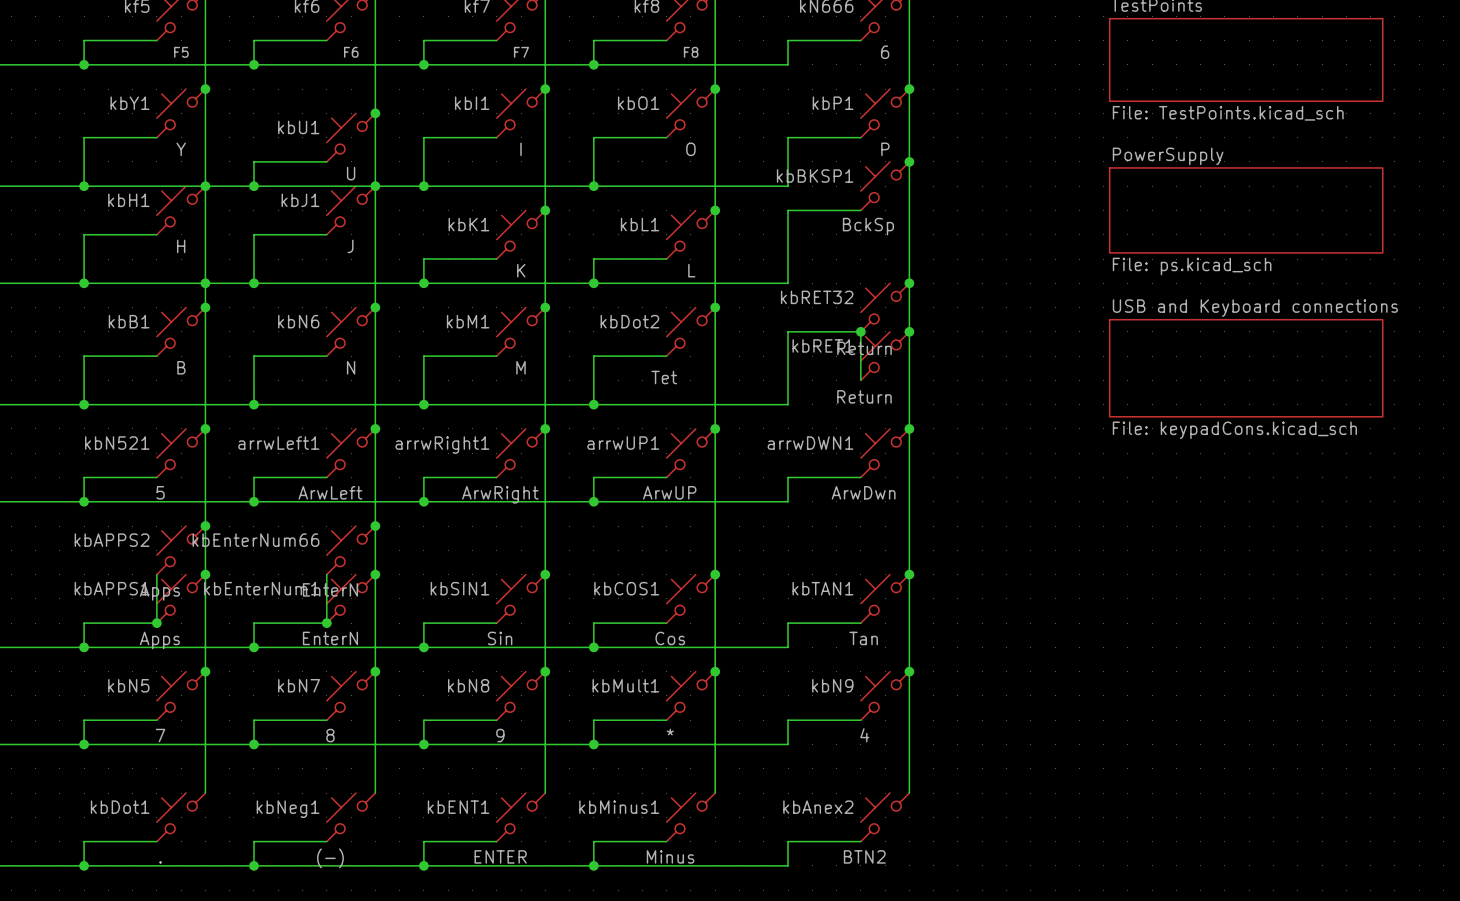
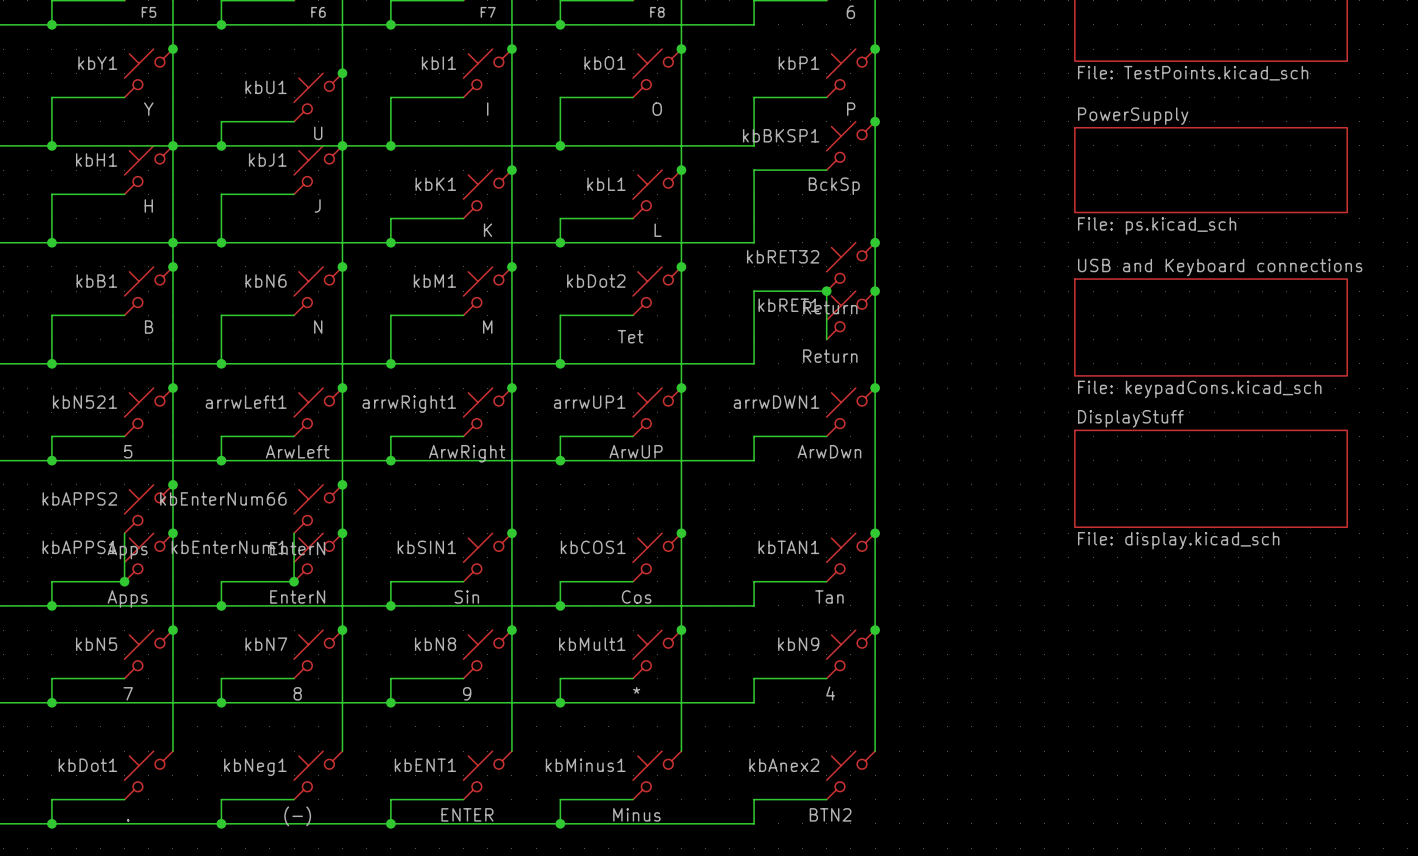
sheet DisplayStuff: none -> File: display.kicad_sch (1211, 478)

